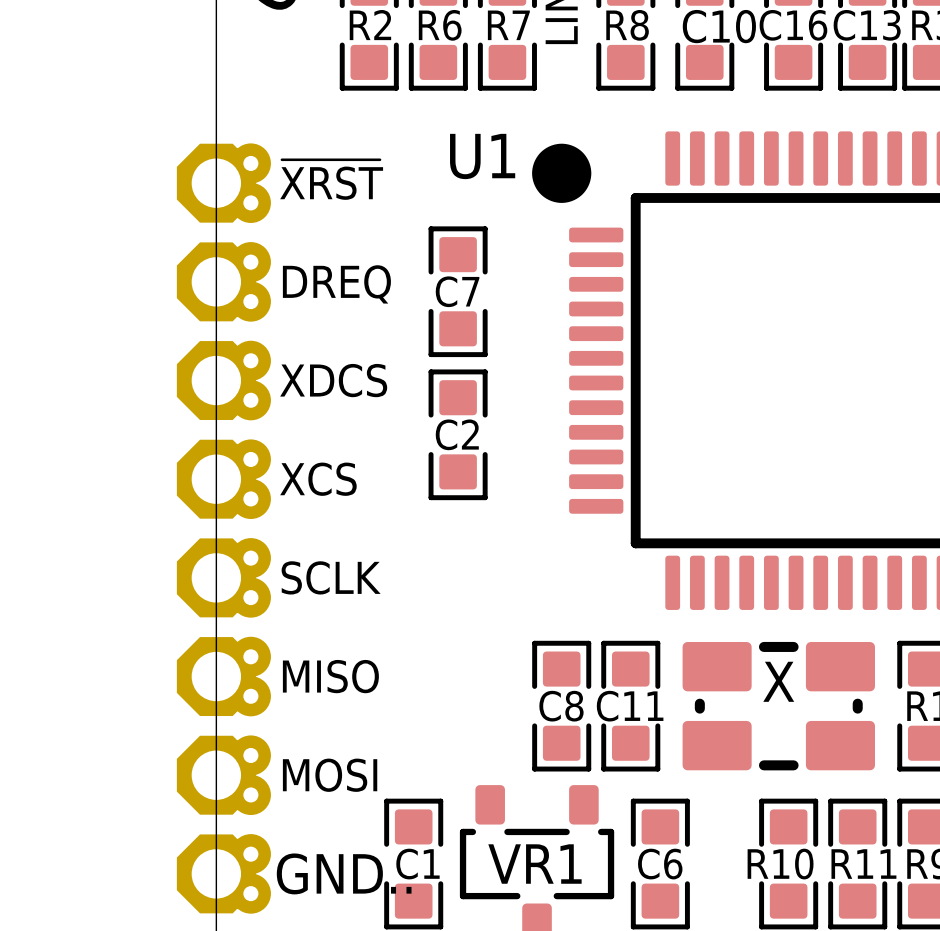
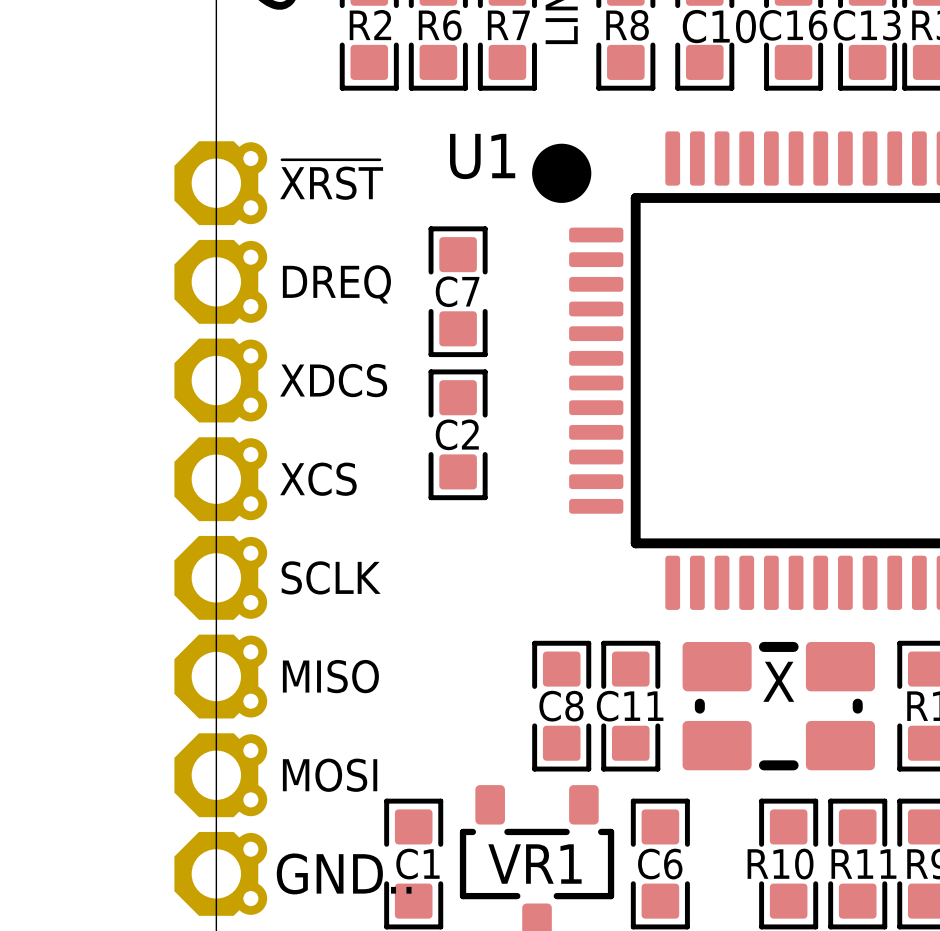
~{XRST} footprint: [176, 143, 271, 223] -> [174, 141, 268, 226]
DREQ footprint: [176, 242, 271, 322] -> [174, 239, 268, 324]
XDCS footprint: [176, 340, 271, 421] -> [174, 338, 268, 423]
XCS footprint: [176, 439, 271, 519] -> [174, 437, 268, 522]
SCLK footprint: [176, 538, 271, 618] -> [174, 535, 268, 620]
MISO footprint: [176, 636, 271, 717] -> [174, 634, 268, 719]
MOSI footprint: [176, 735, 271, 816] -> [174, 733, 268, 818]
GND.. footprint: [176, 834, 271, 914] -> [174, 831, 268, 916]

